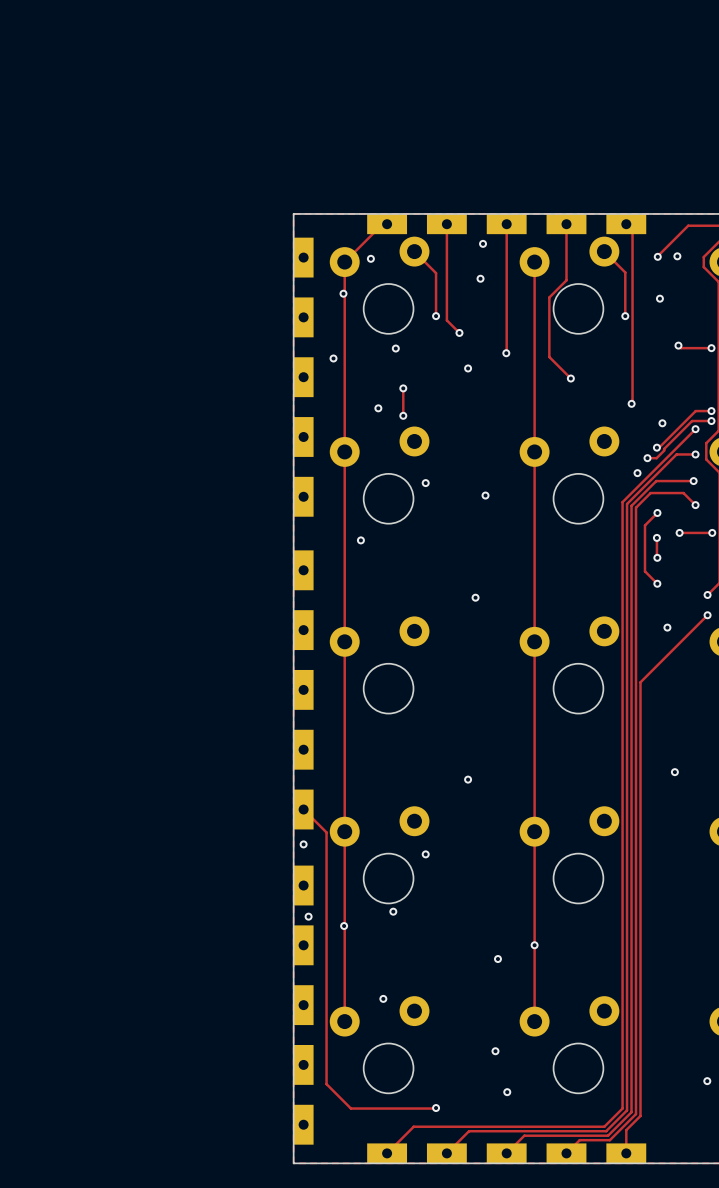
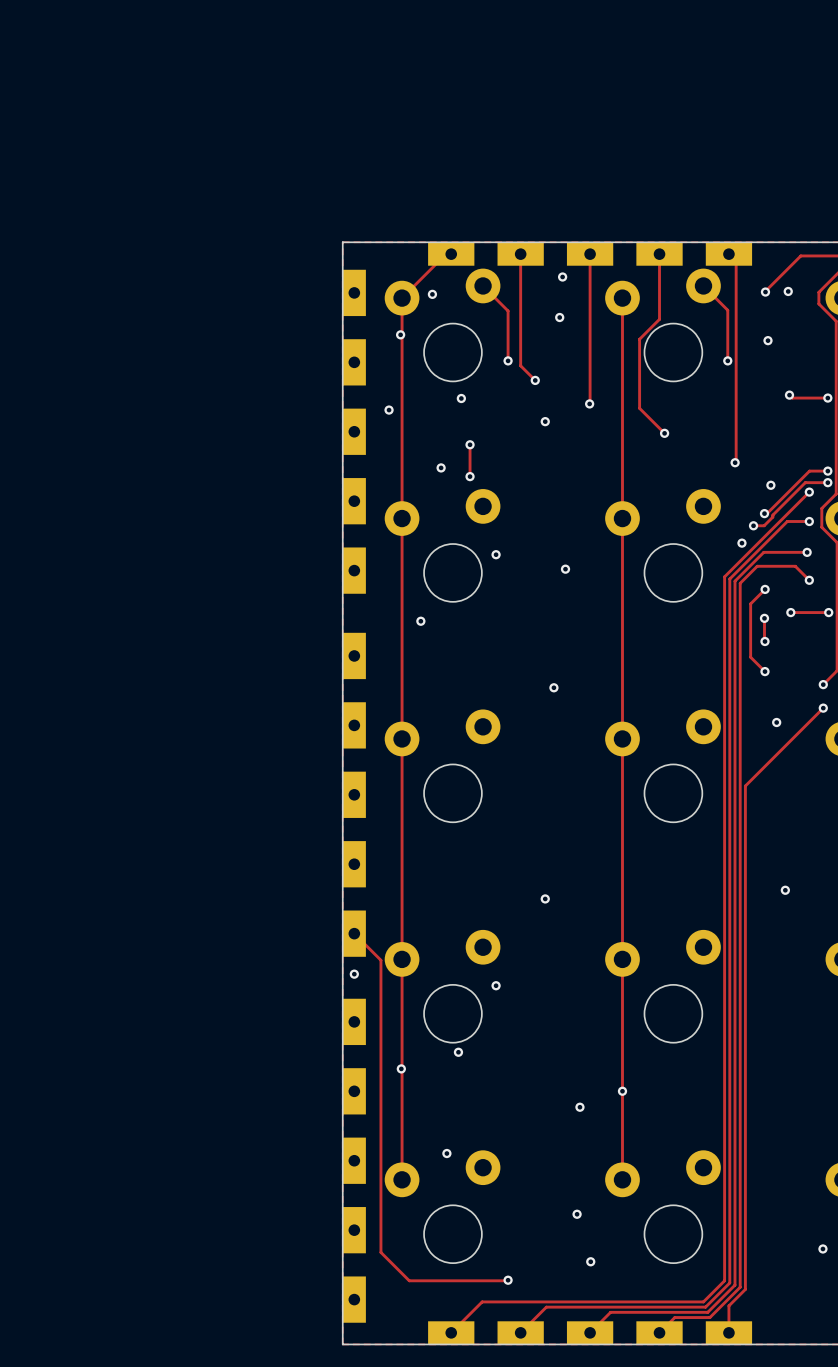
via: (308, 916) -> none

